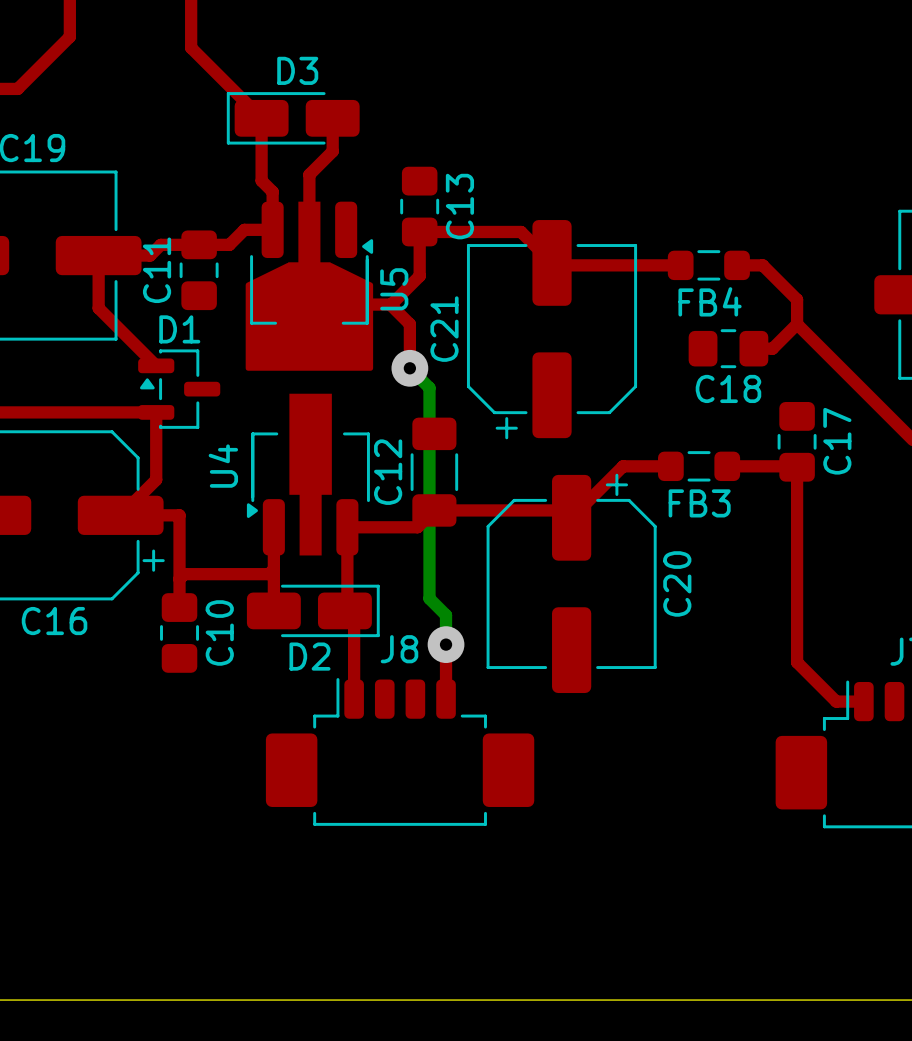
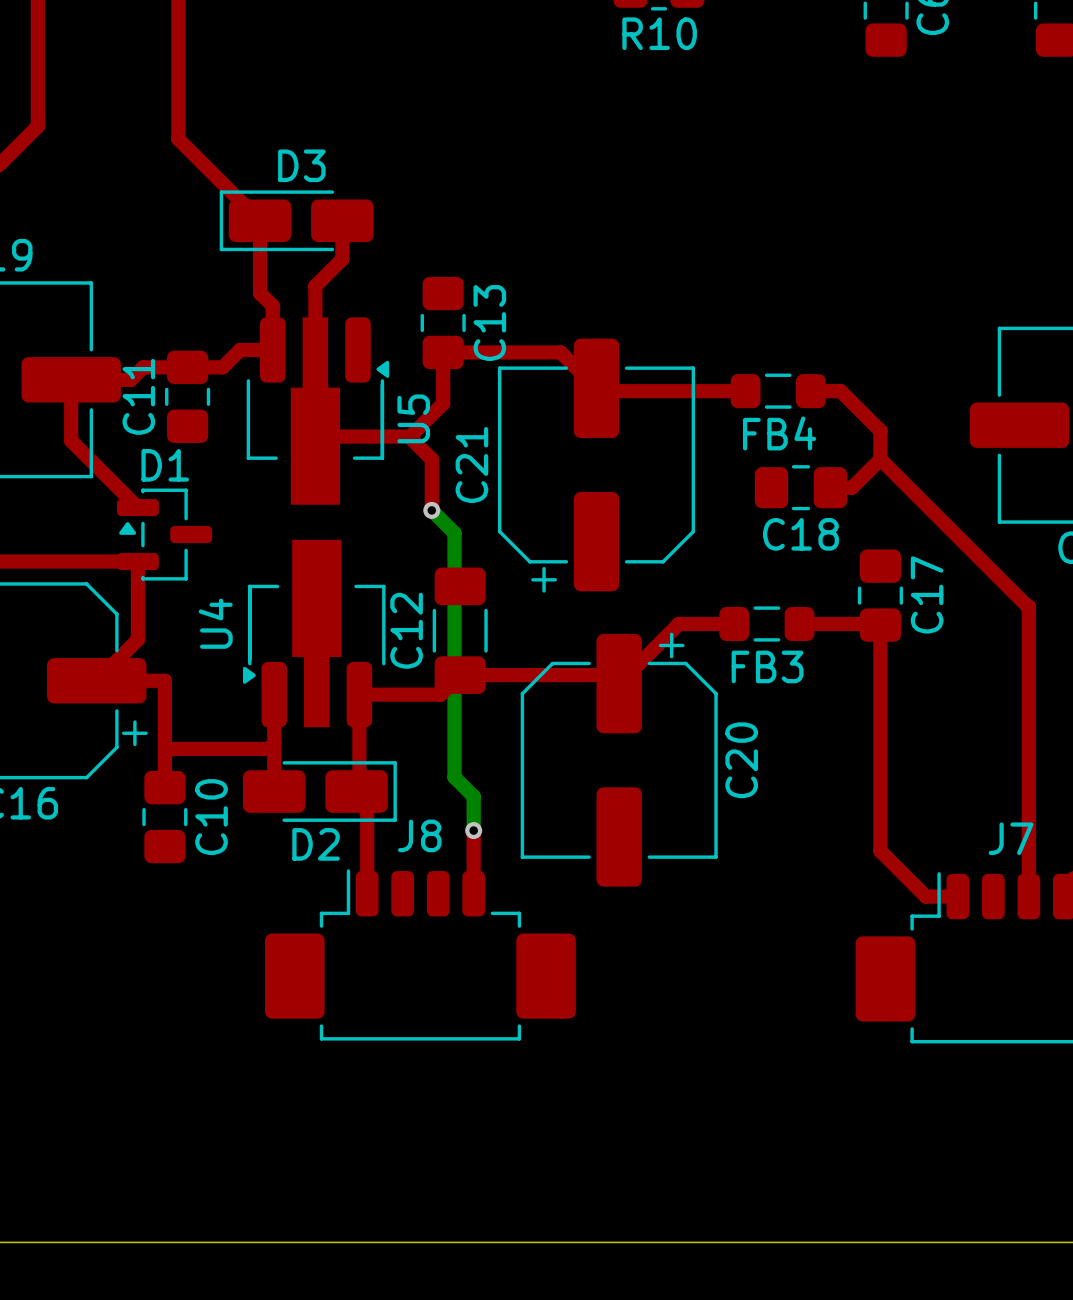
drawing: [245, 262, 374, 371] -> none
via size: [391, 349, 429, 387] -> [423, 501, 441, 519]
via size: [427, 626, 465, 663] -> [465, 822, 483, 840]

